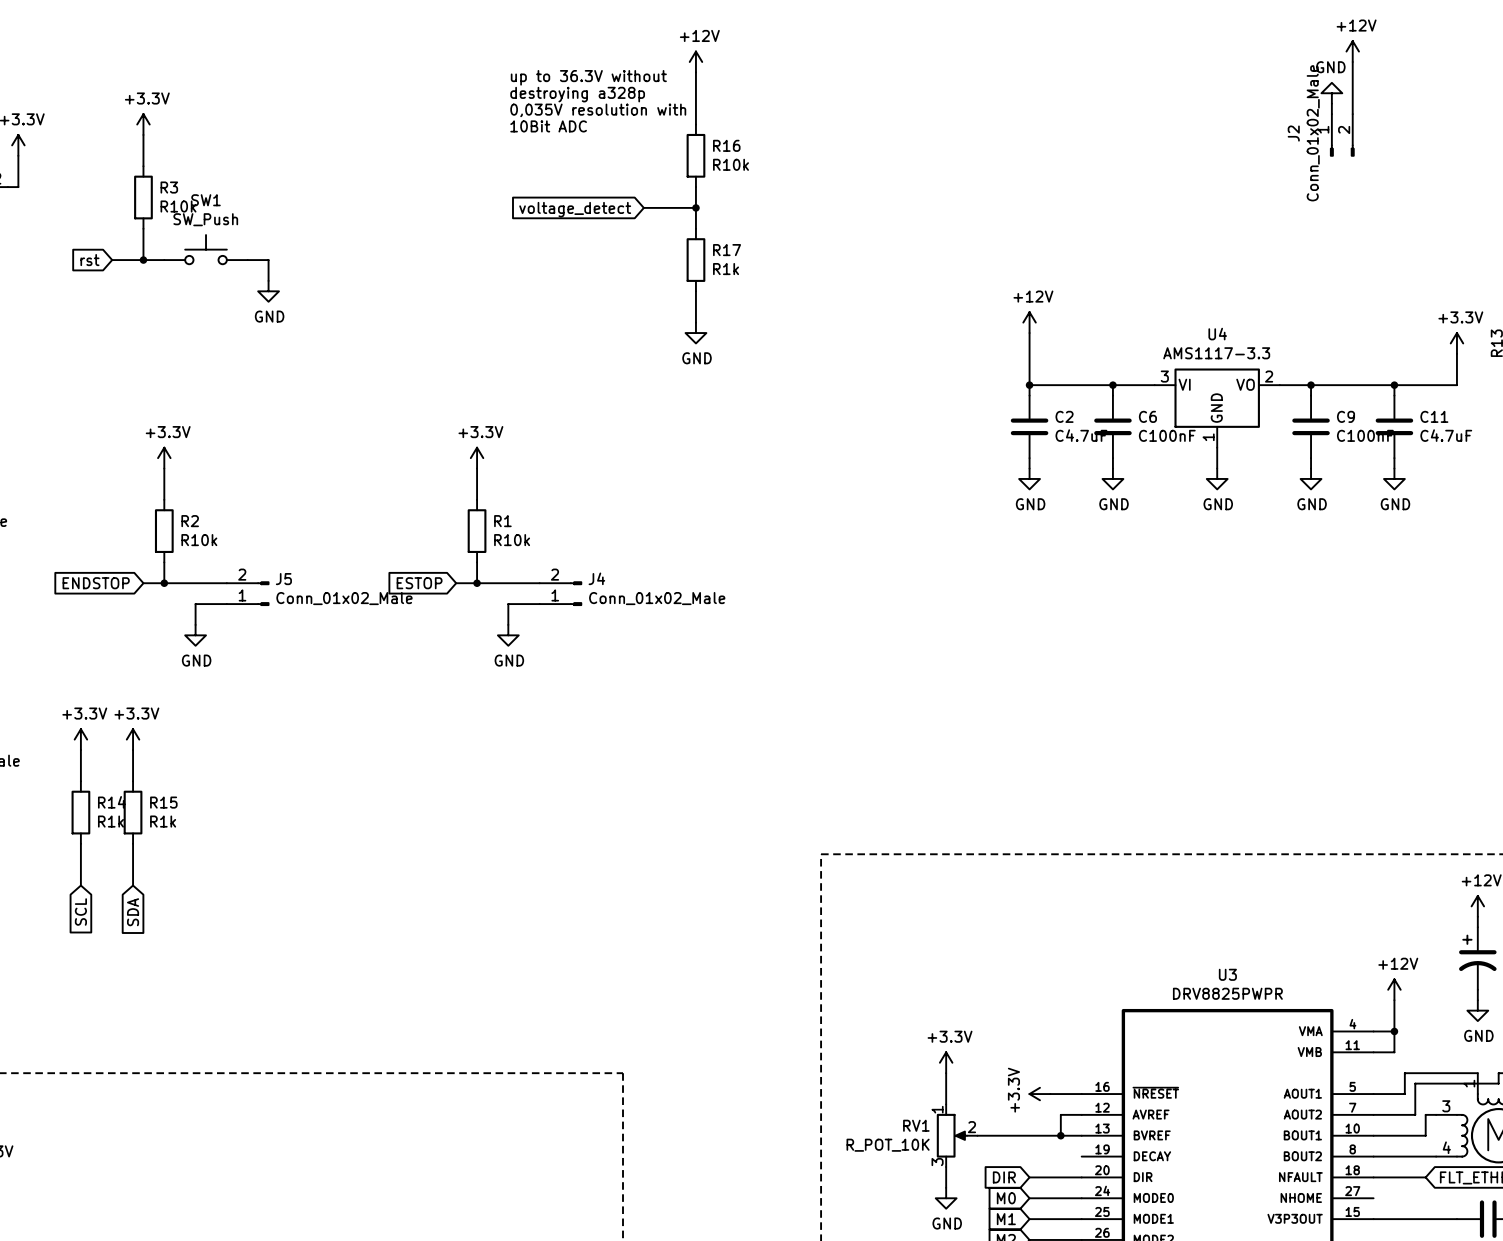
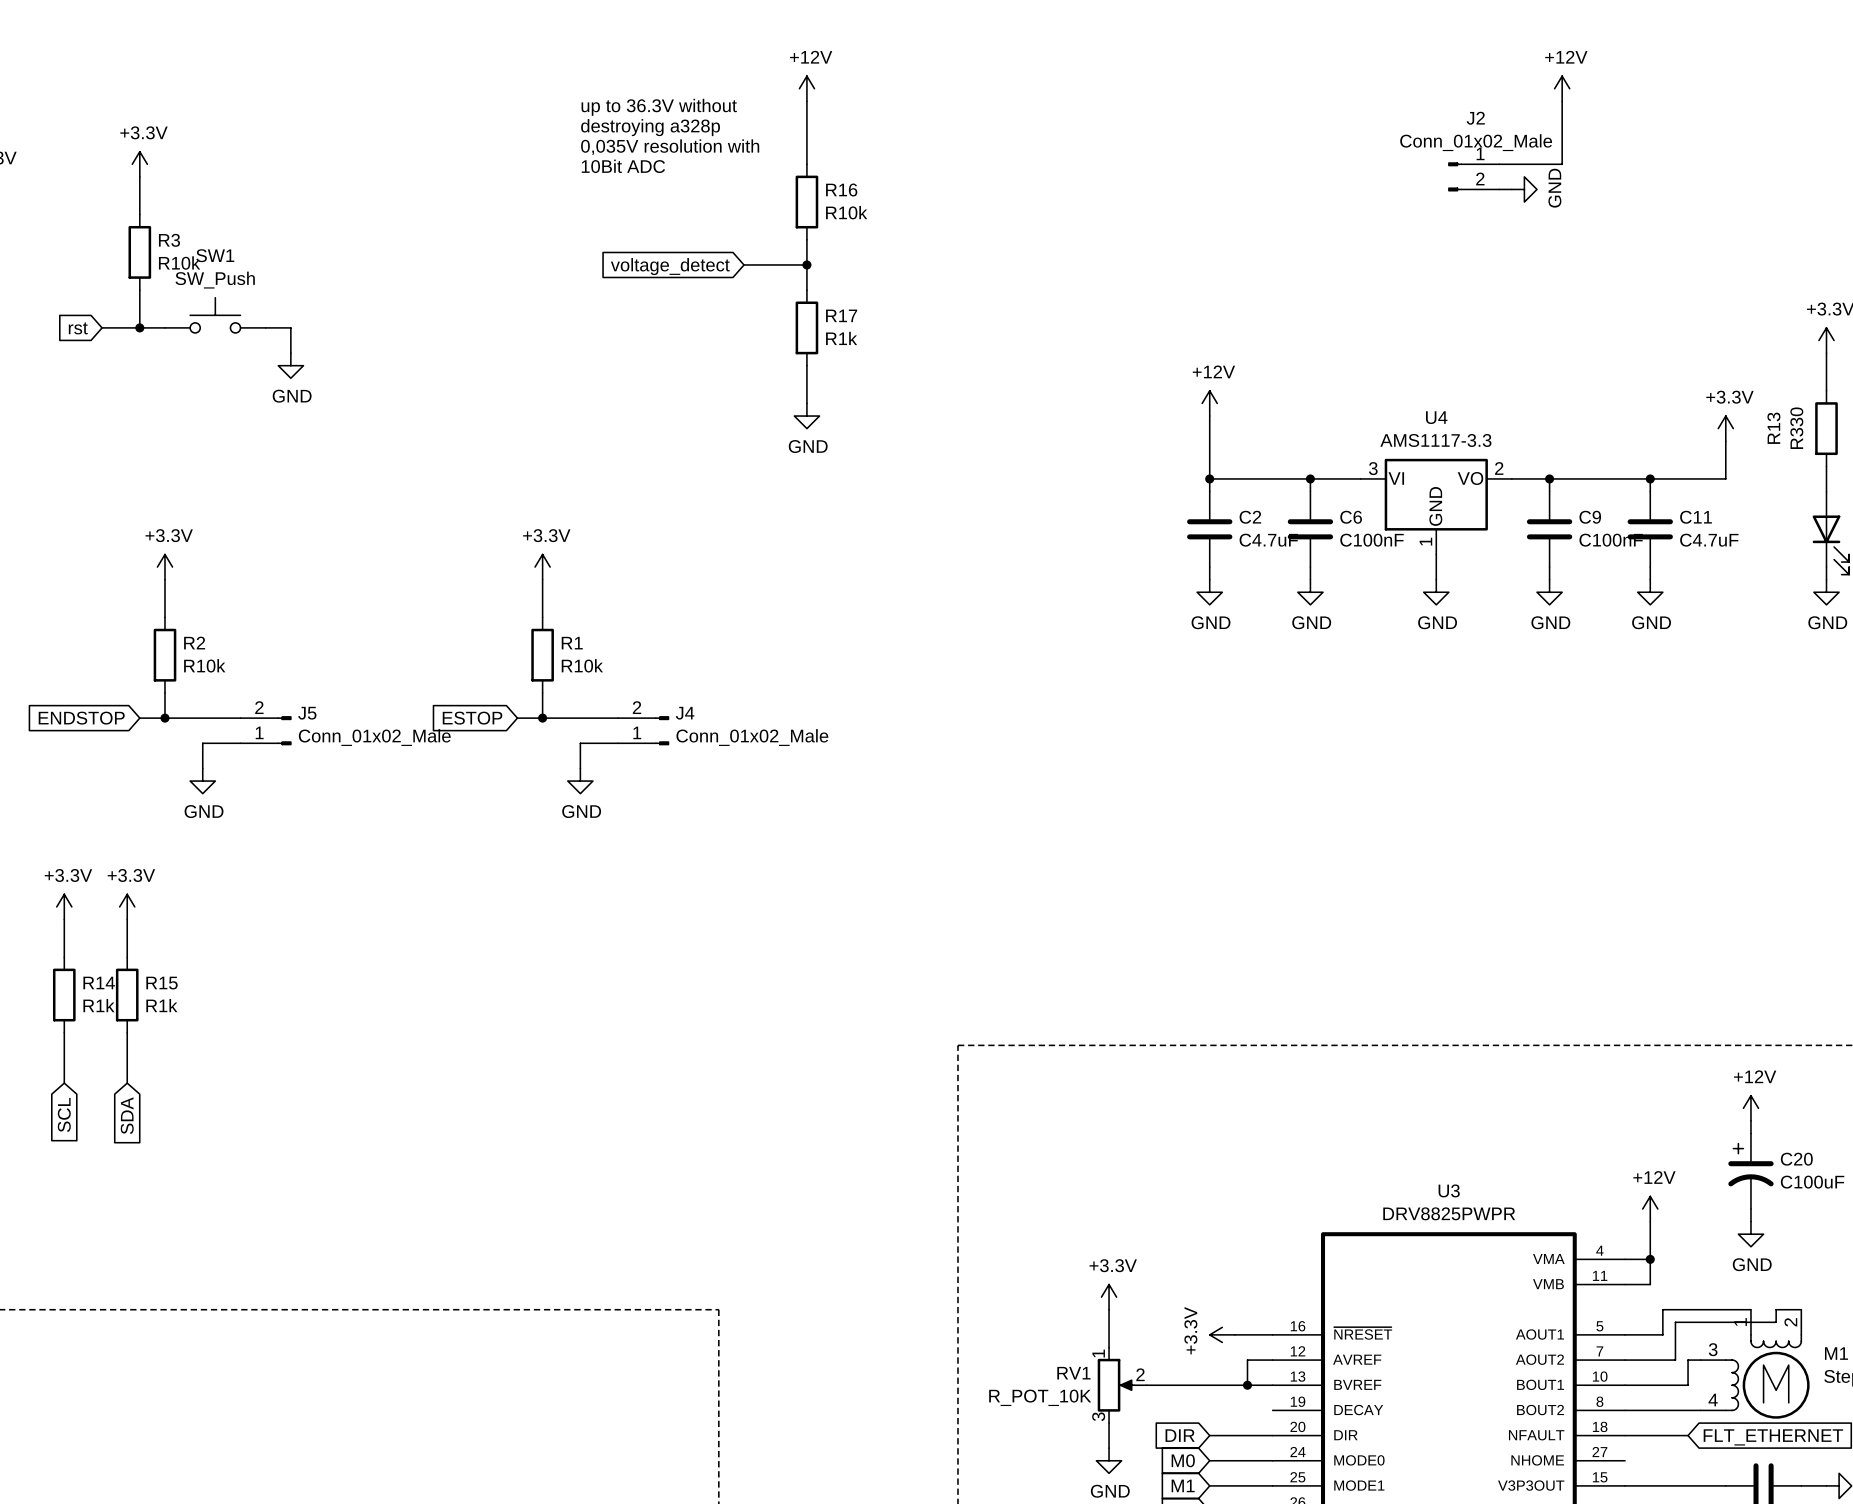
power symbol position: +12V (1352, 51) -> +12V (1562, 88)
wire: (1352, 61) (1352, 114) -> none
wire: none -> (1562, 101) (1562, 164) (1499, 164)
power symbol rotation: 0° (1331, 93) -> 90° clockwise (1524, 189)
power symbol position: GND (1331, 93) -> GND (1524, 189)
wire: (1331, 103) (1331, 114) -> none
J2 position: (1342, 135) -> (1473, 176)
wire: none -> (1499, 189) (1511, 189)
J2 rotation: 0° (1342, 150) -> 90° clockwise (1455, 176)

